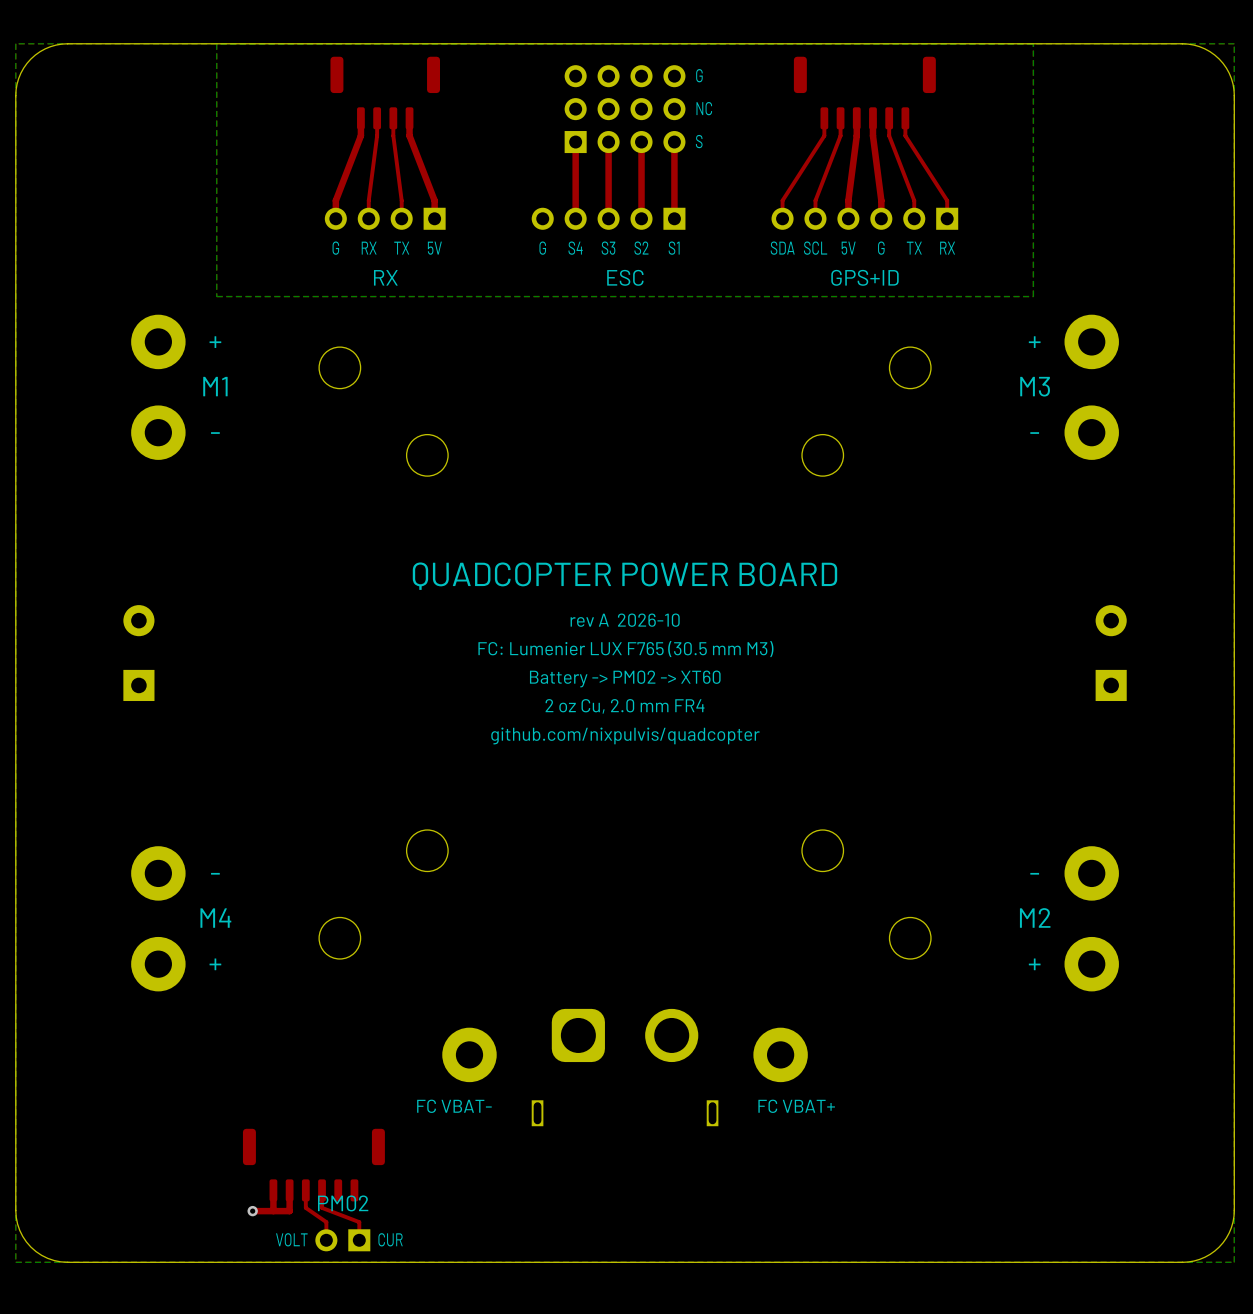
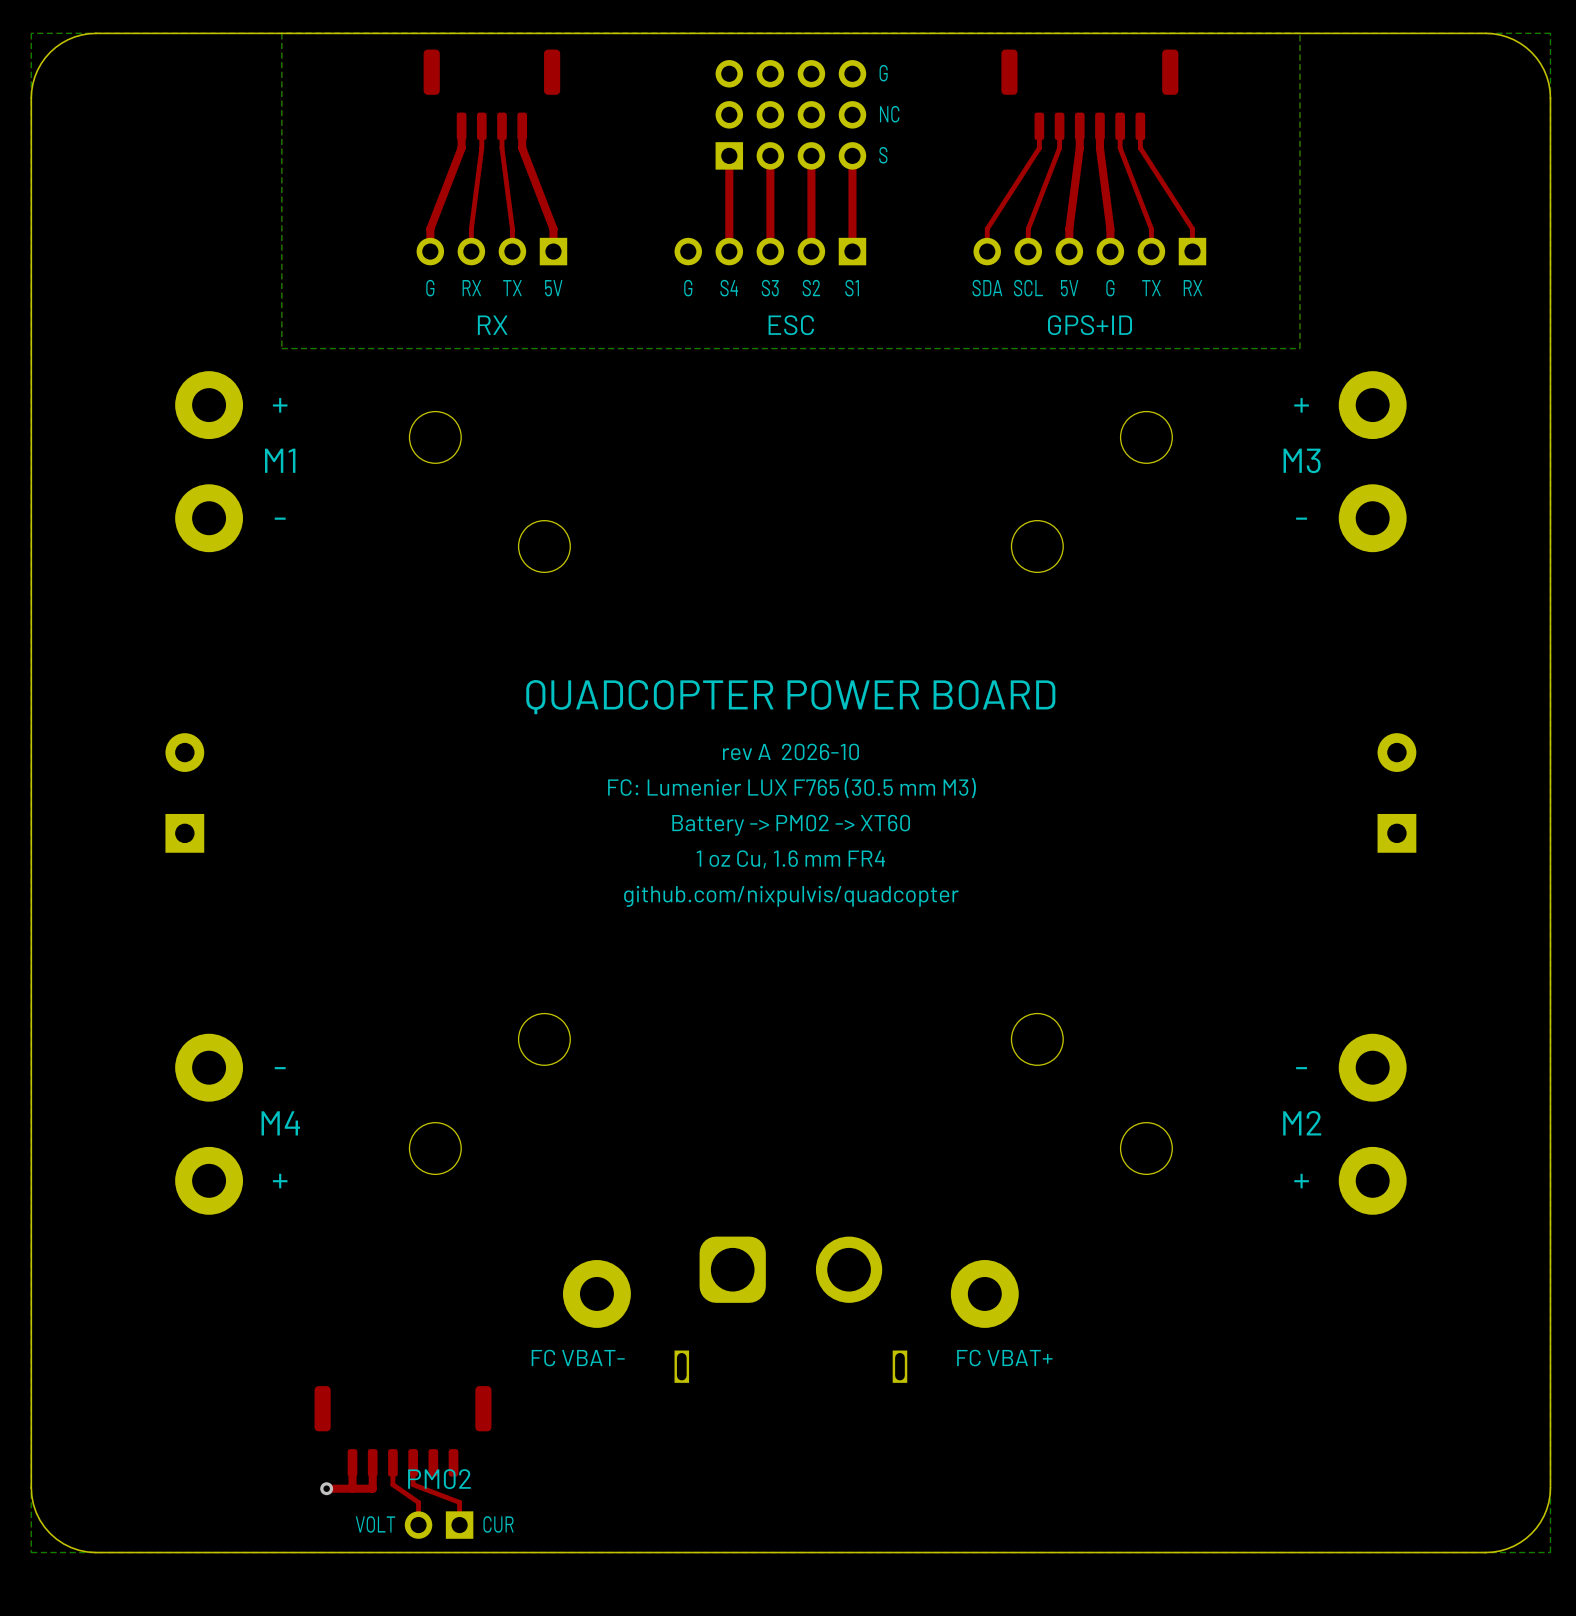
text: 2 oz Cu, 2.0 mm FR4 (625, 706) -> 1 oz Cu, 1.6 mm FR4 (790, 859)

